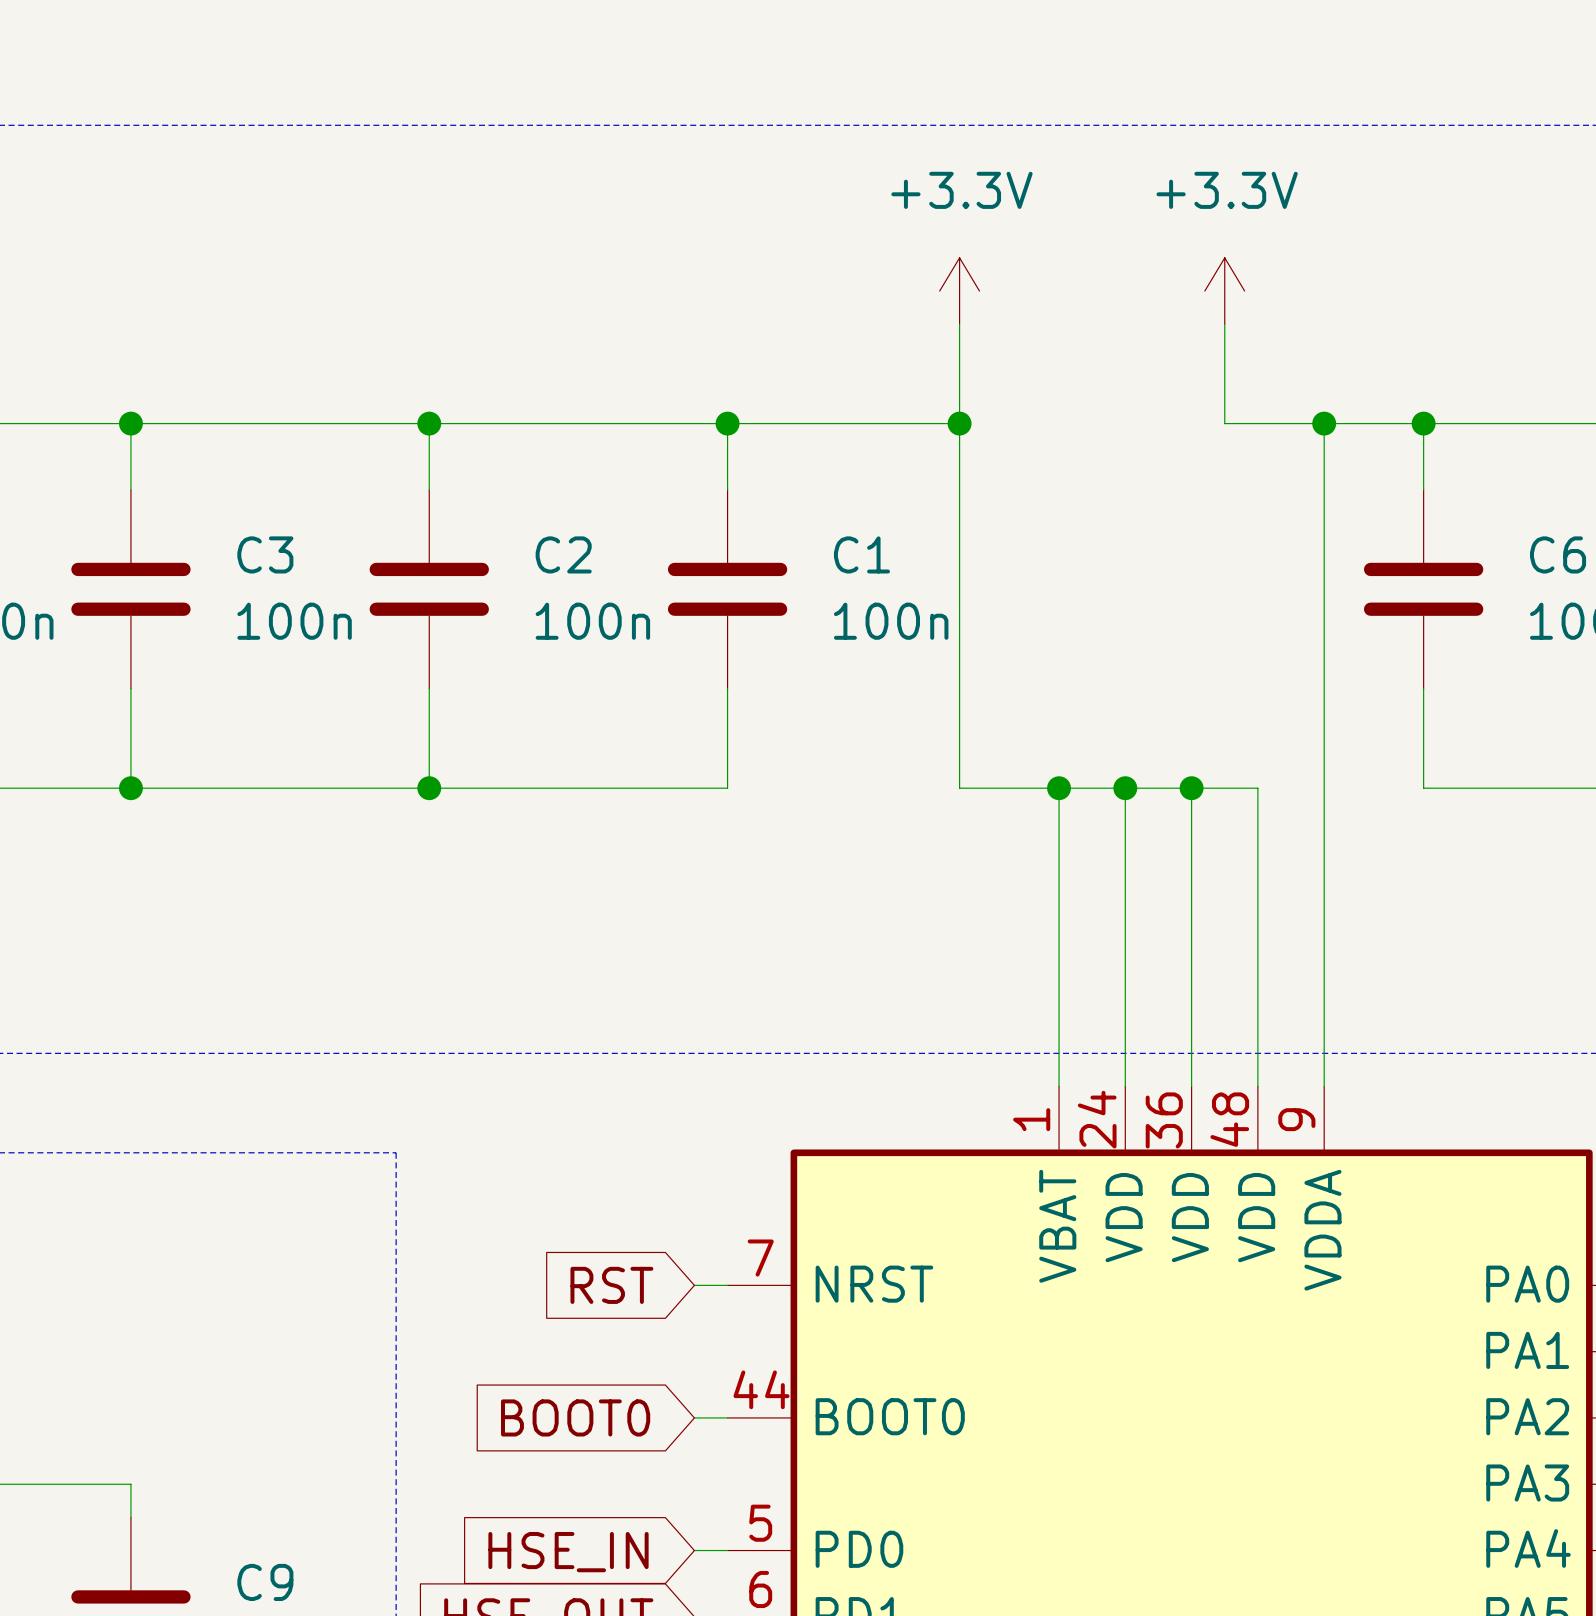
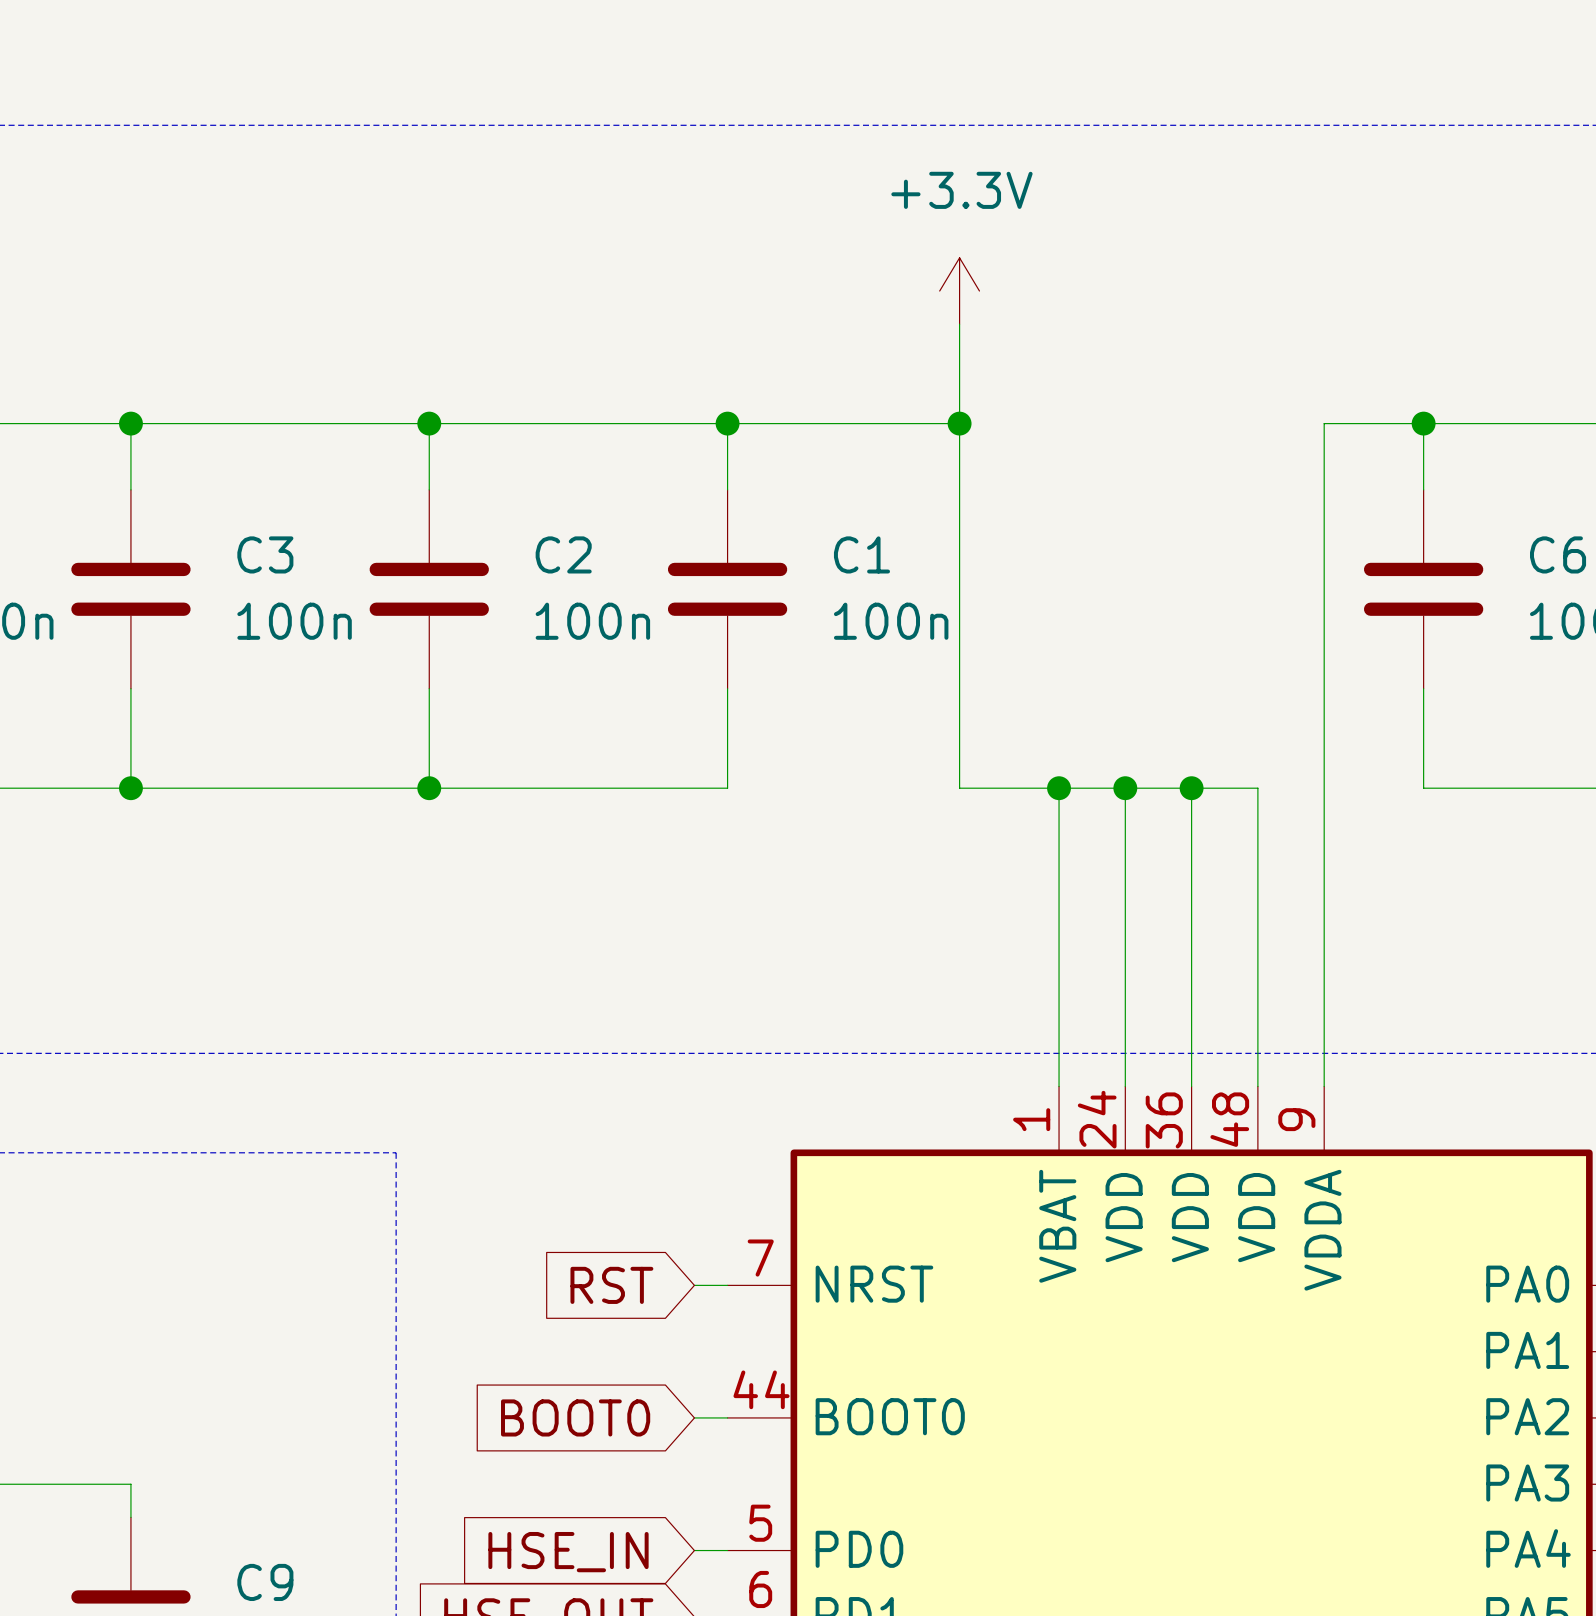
power symbol: +3.3V (1224, 291) -> none
wire: (1224, 324) (1224, 423) (1324, 423) -> none
junction: (1324, 423) -> none

